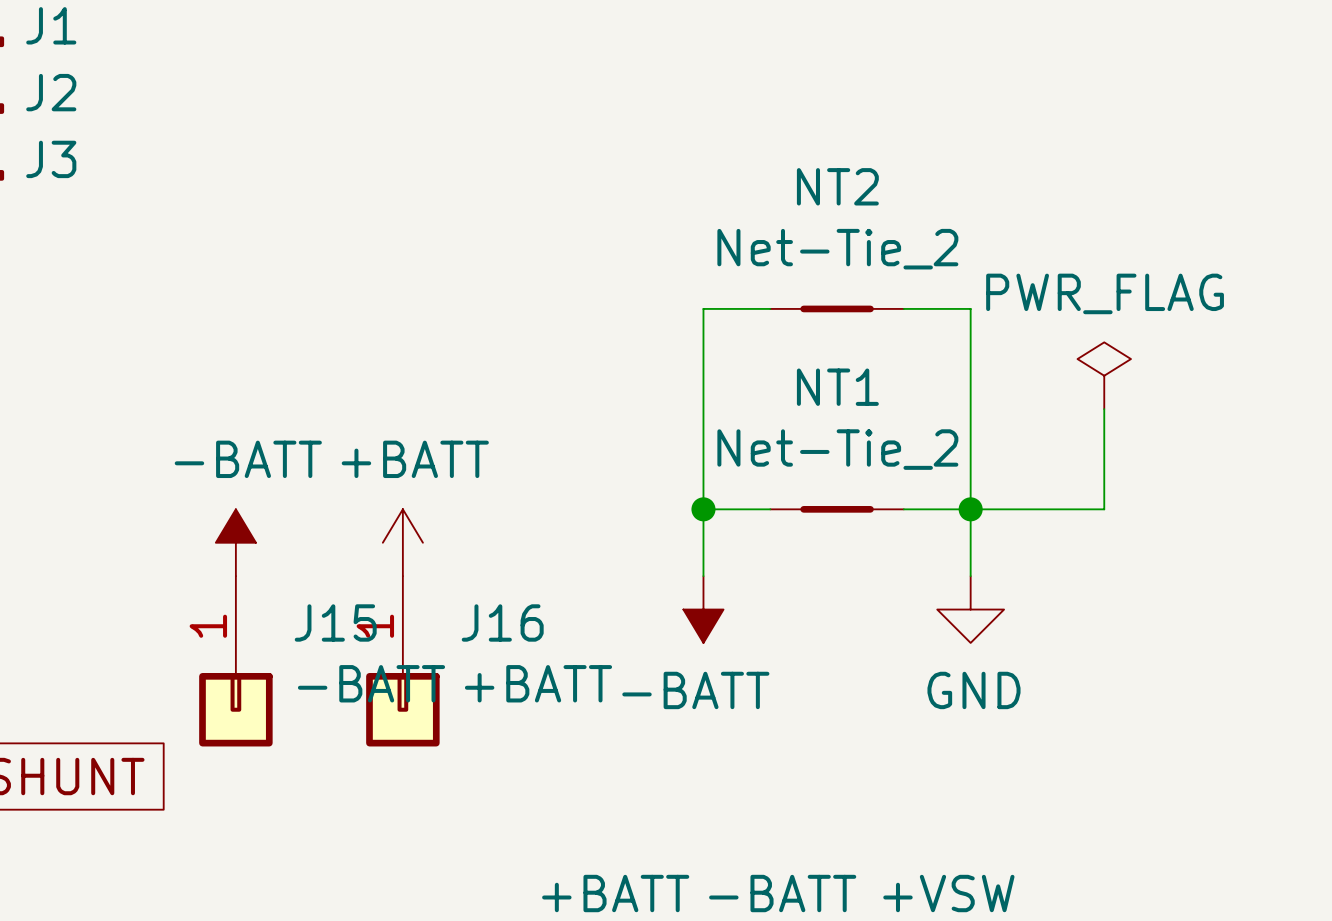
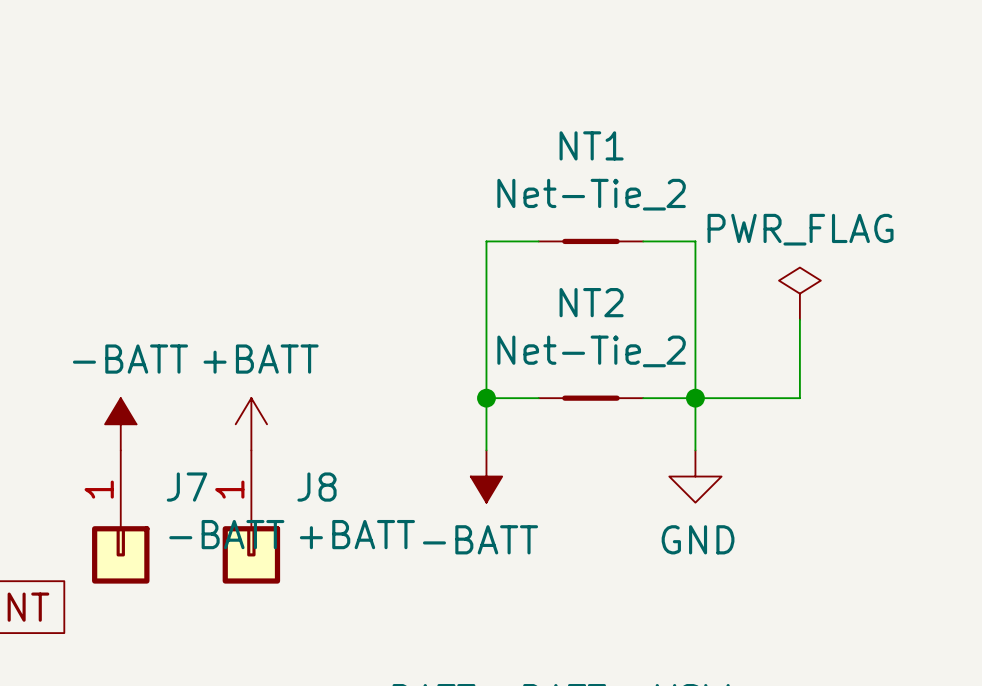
NT2 name: NT2 (837, 186) -> NT1 (591, 145)
NT1 name: NT1 (837, 387) -> NT2 (591, 302)
J15 name: J15 (335, 622) -> J7 (187, 487)
J16 name: J16 (502, 622) -> J8 (317, 487)

